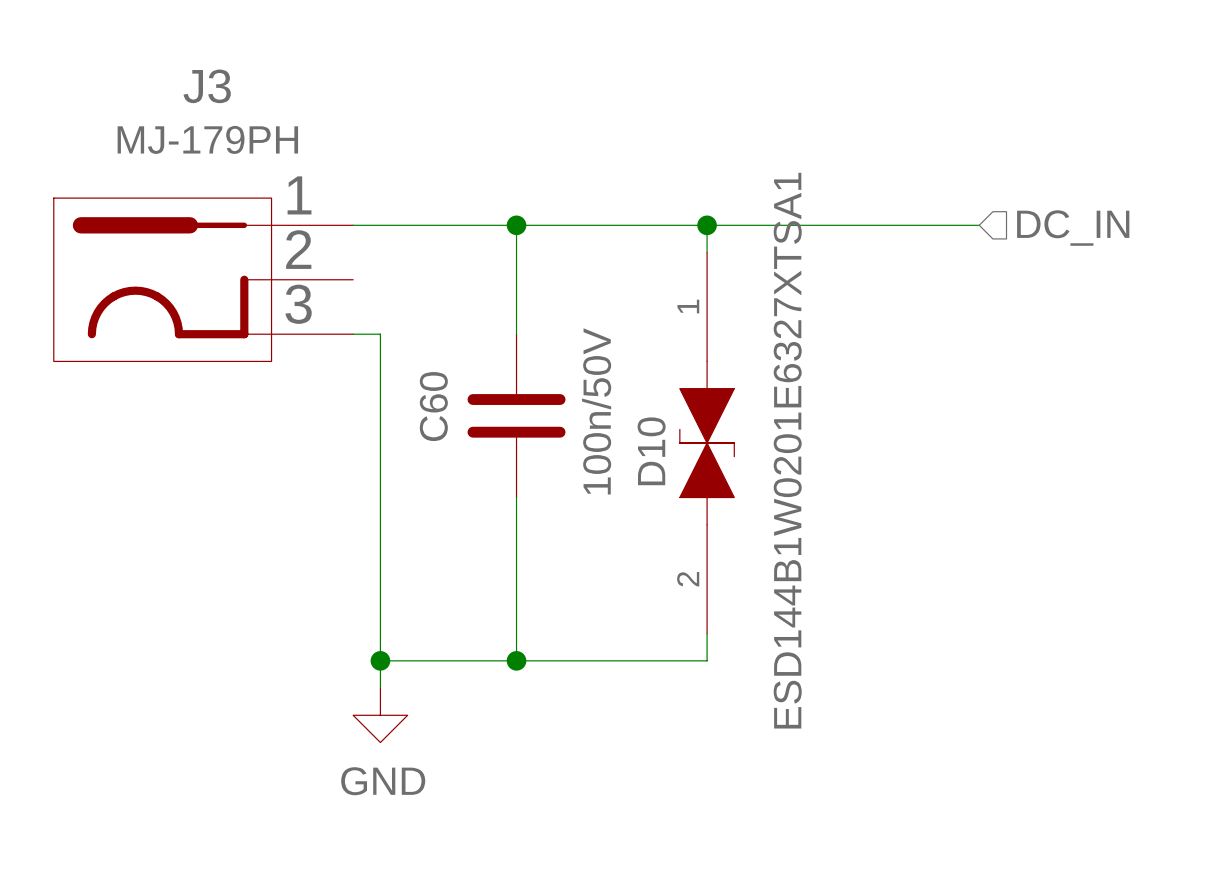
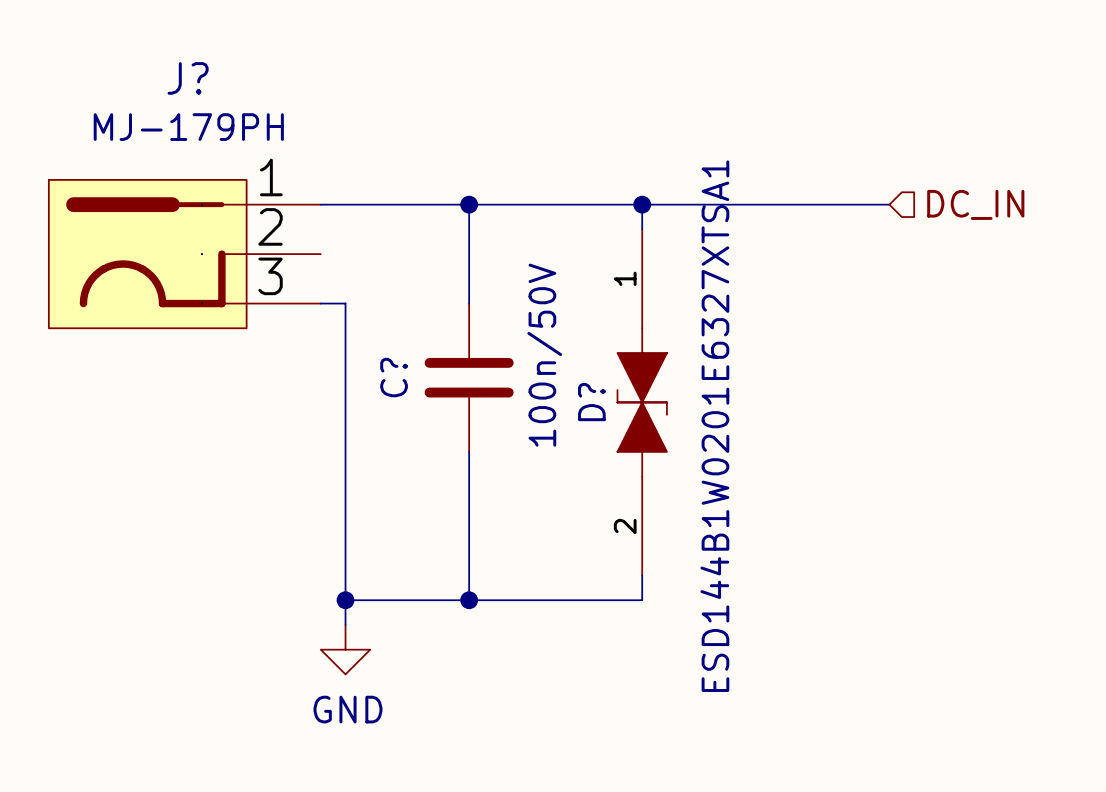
J3 name: J3 (207, 86) -> J? (188, 78)
C60 name: C60 (433, 406) -> C? (394, 377)
D10 name: D10 (651, 451) -> D? (591, 402)

